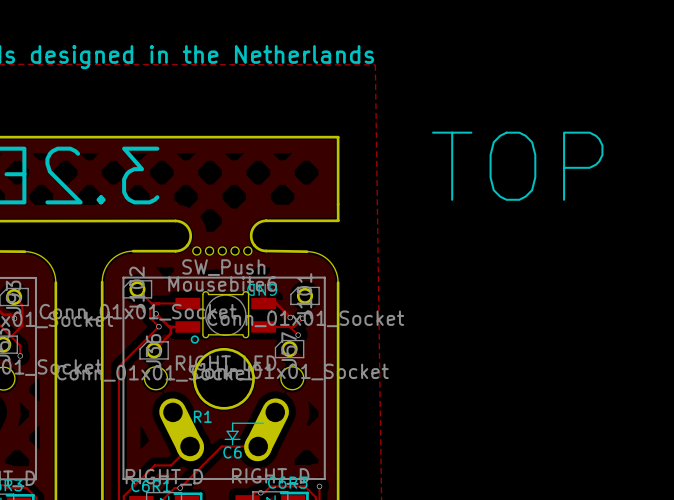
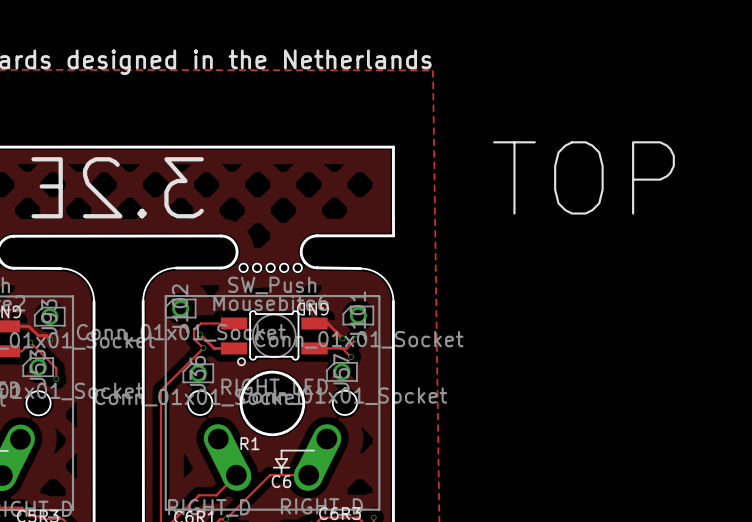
track: (137, 289) (151, 303) (156, 303) -> none
track: (14, 297) (22, 305) (22, 325) (11, 336) -> none
track: (170, 326) (170, 333) (154, 350) -> none

